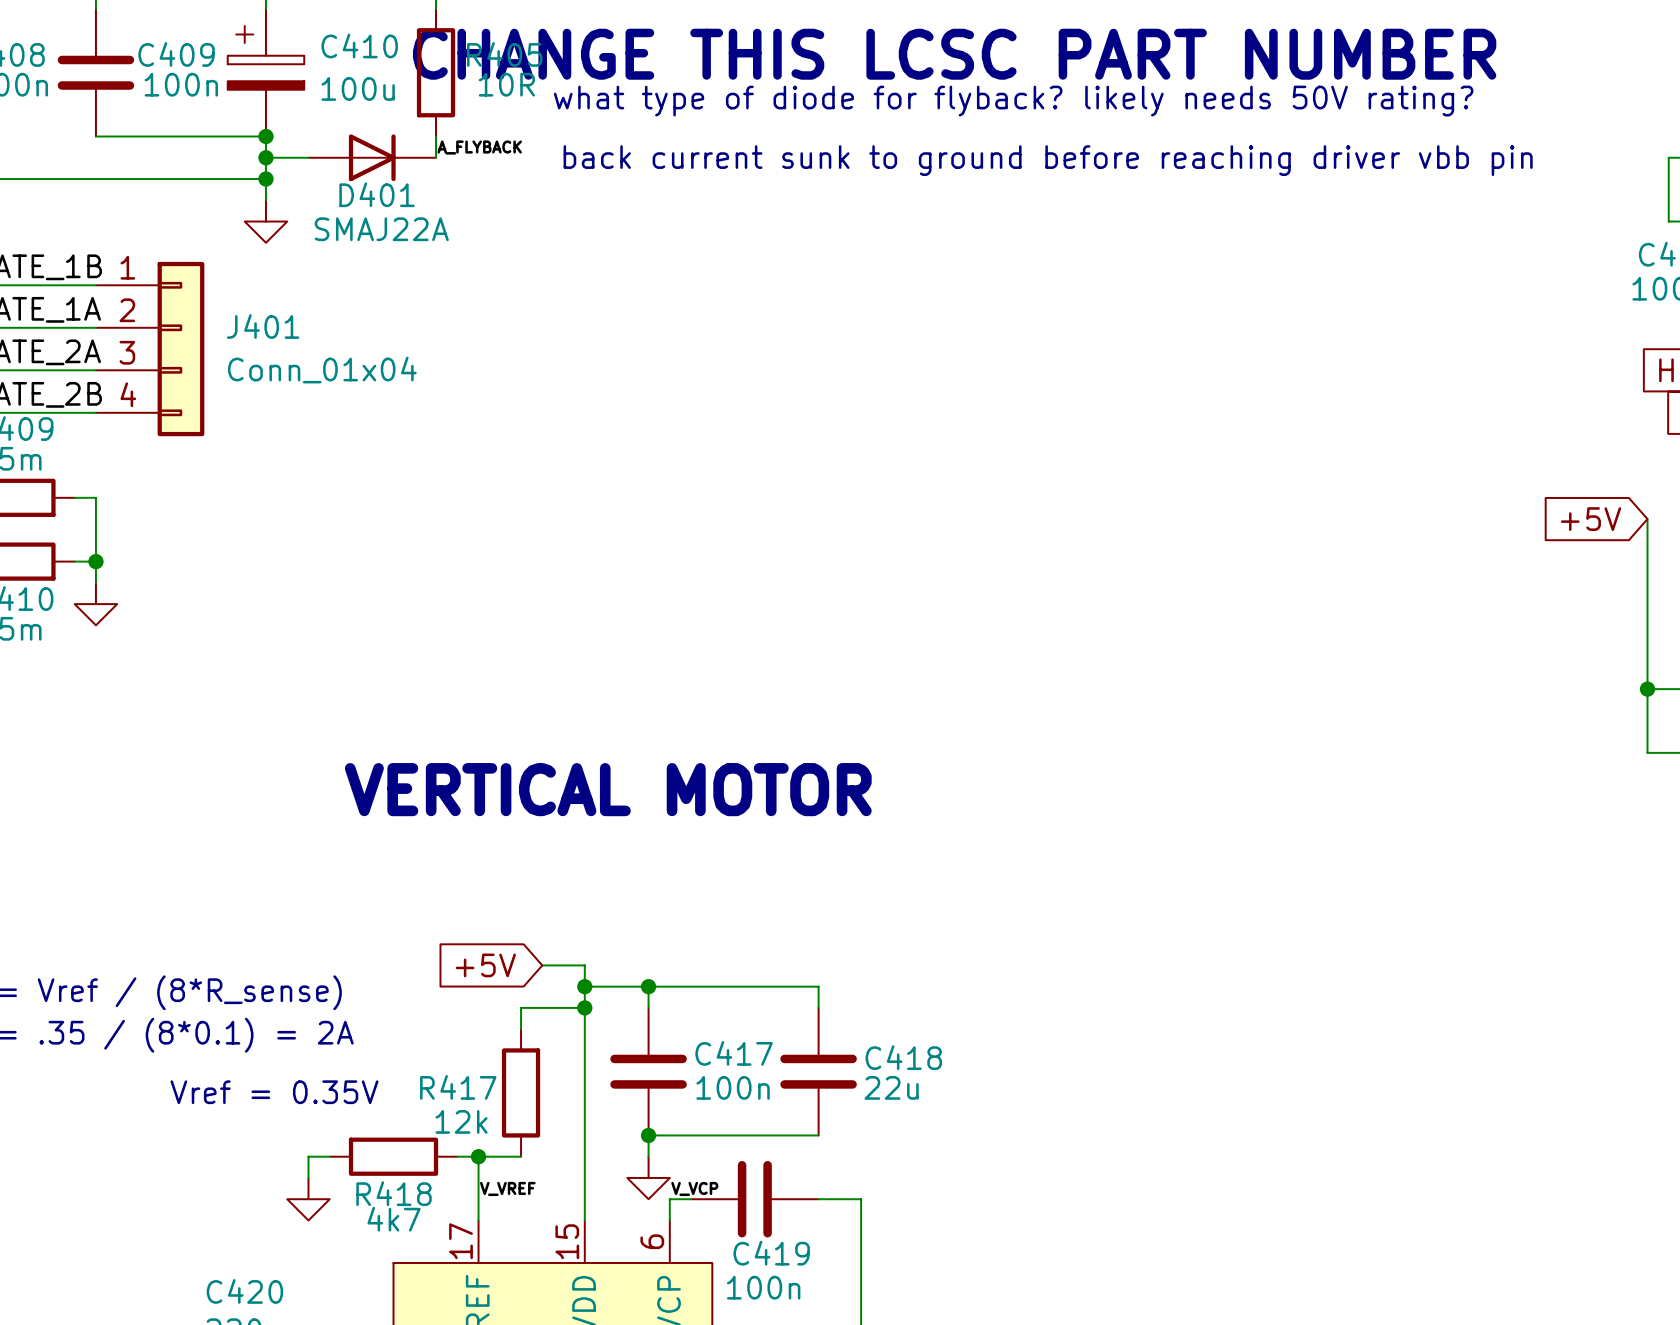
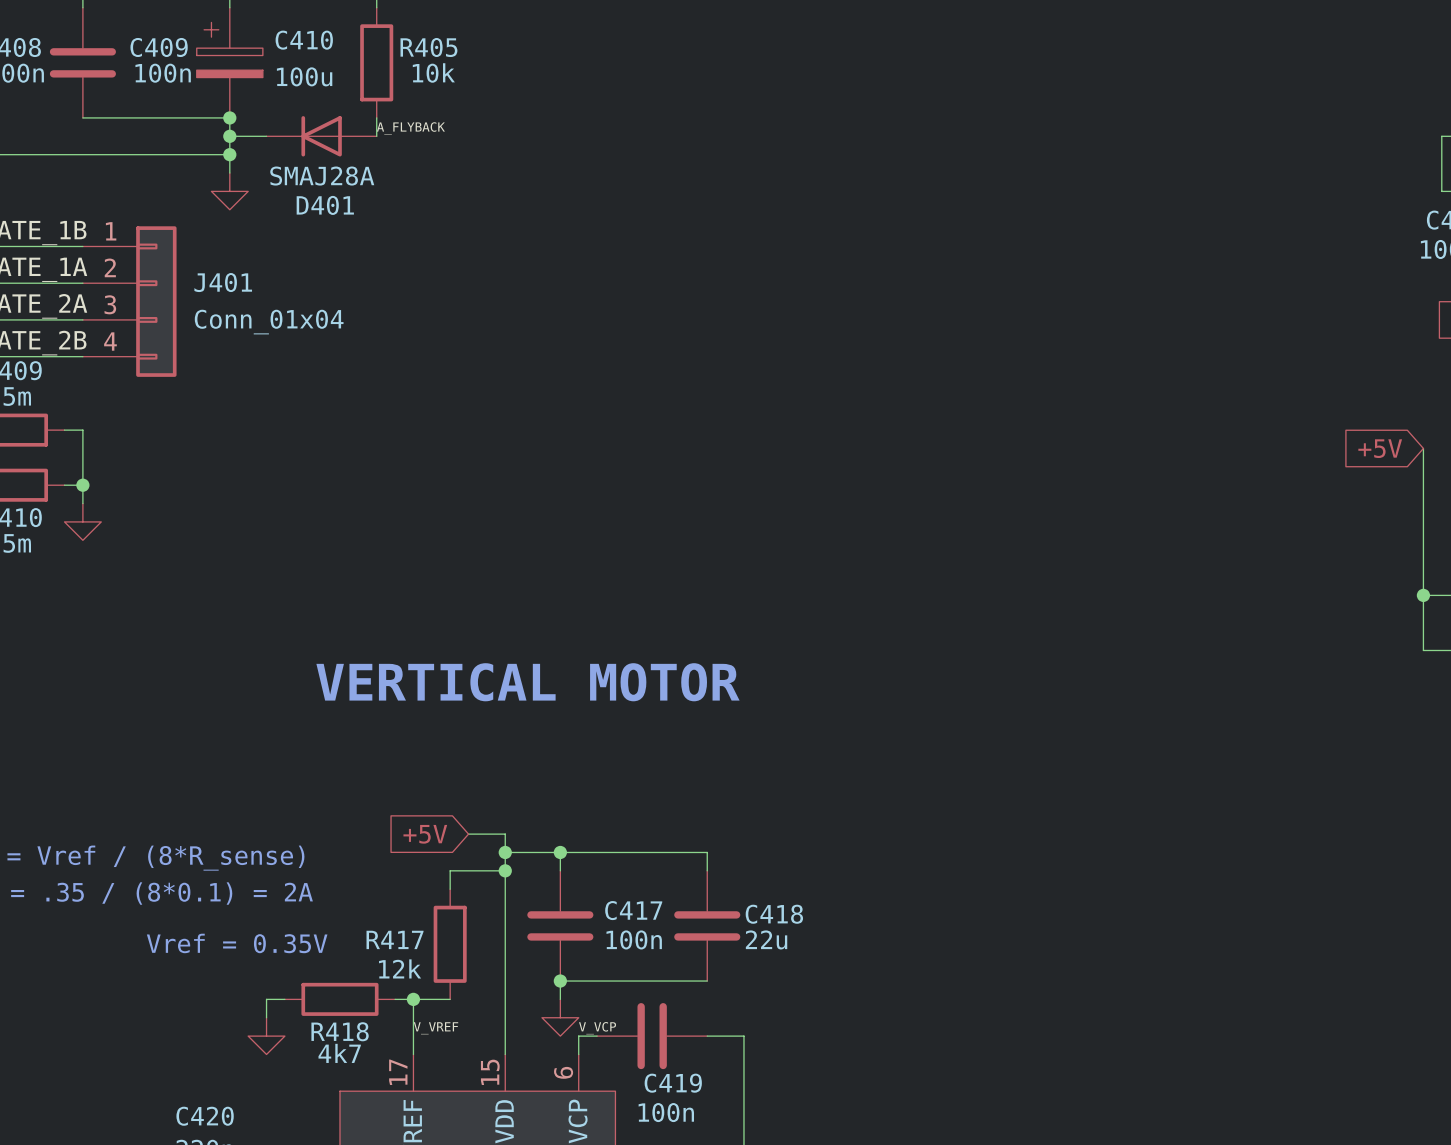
text: CHANGE THIS LCSC PART NUMBER (954, 54) -> none
R405 value: 10R (506, 84) -> 10k (433, 72)
text: what type of diode for flyback? likely needs 50V rating? (1013, 101) -> none
D401 rotation: 0° (372, 157) -> 180° (321, 136)
text: back current sunk to ground before reaching driver vbb pin (1048, 160) -> none
D401 name position: D401 (377, 194) -> D401 (325, 205)
D401 value: SMAJ22A (381, 229) -> SMAJ28A (322, 176)

